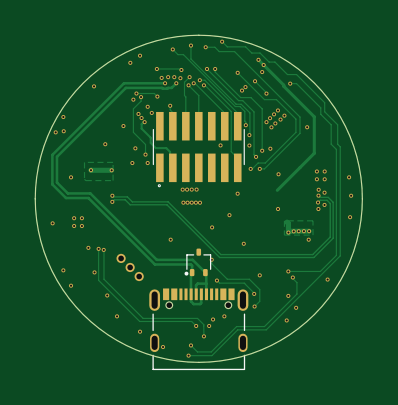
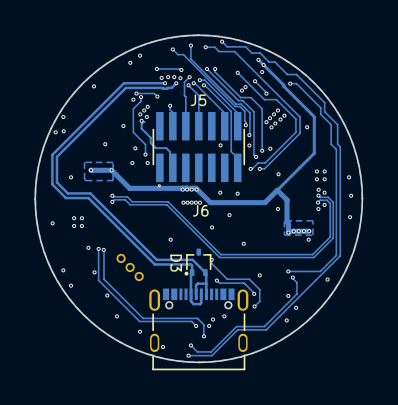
J5 name: none -> J5 (198, 100)
via: none -> (144, 110)
via: (151, 112) -> none
via: (138, 113) -> none
via: none -> (140, 114)
via: none -> (146, 116)
via: (141, 118) -> none
via: none -> (141, 120)
via: (144, 122) -> none
track: none -> (111, 170) (129, 188) (196, 188) (210, 202) (264, 202) (277, 190) (287, 200) (287, 222)
via: none -> (220, 192)
J6 name: none -> J6 (200, 210)
D3 name: none -> D3 (176, 263)

